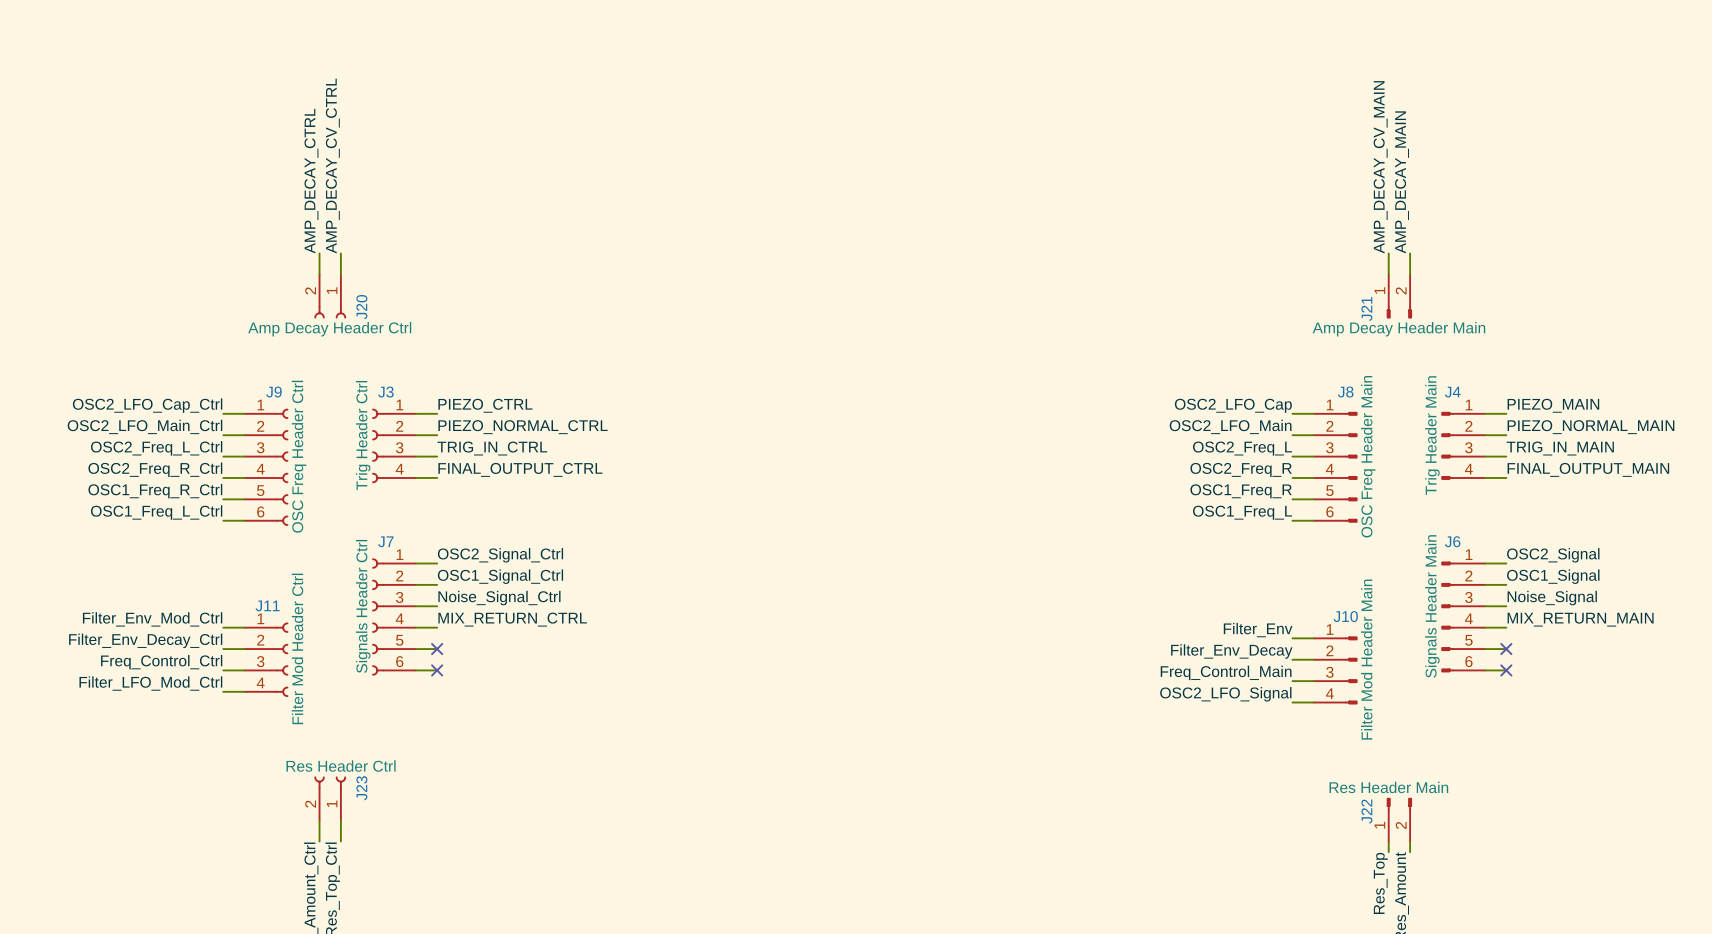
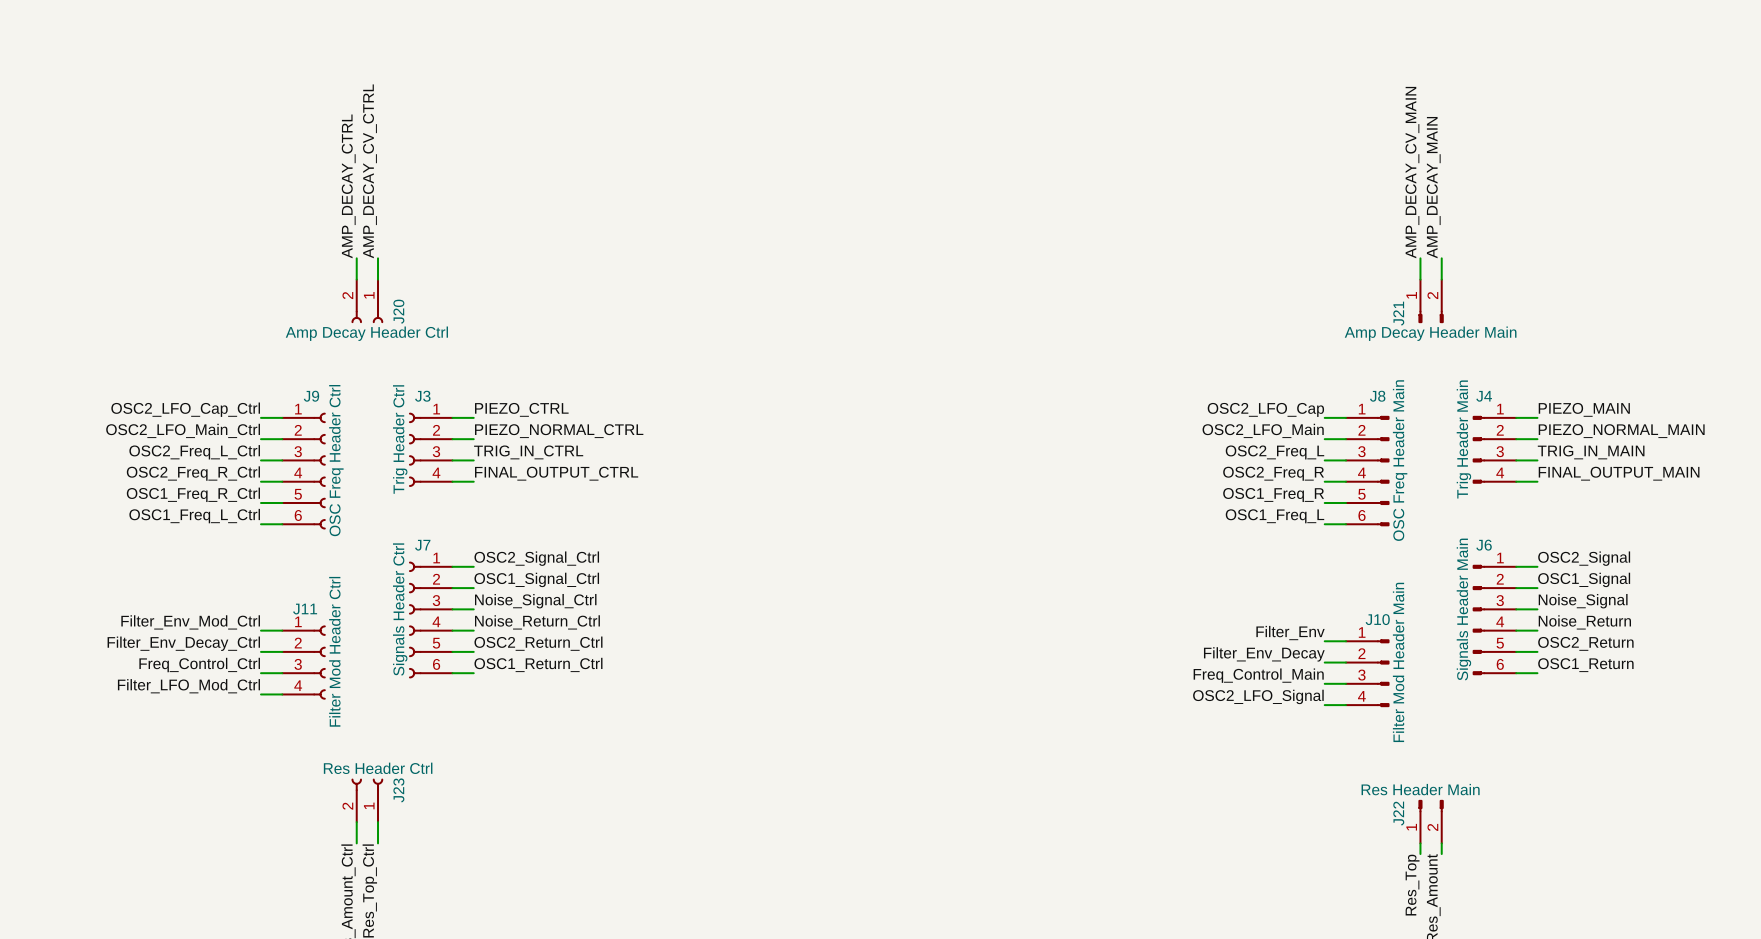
label: MIX_RETURN_CTRL (512, 619) -> Noise_Return_Ctrl (537, 622)
label: MIX_RETURN_MAIN (1580, 619) -> Noise_Return (1584, 622)
label: none -> OSC2_Return_Ctrl (538, 643)
label: none -> OSC2_Return (1585, 643)
no-connect mark: (437, 649) -> none
no-connect mark: (1506, 649) -> none
label: none -> OSC1_Return_Ctrl (538, 664)
label: none -> OSC1_Return (1585, 665)
no-connect mark: (437, 670) -> none
no-connect mark: (1506, 670) -> none

